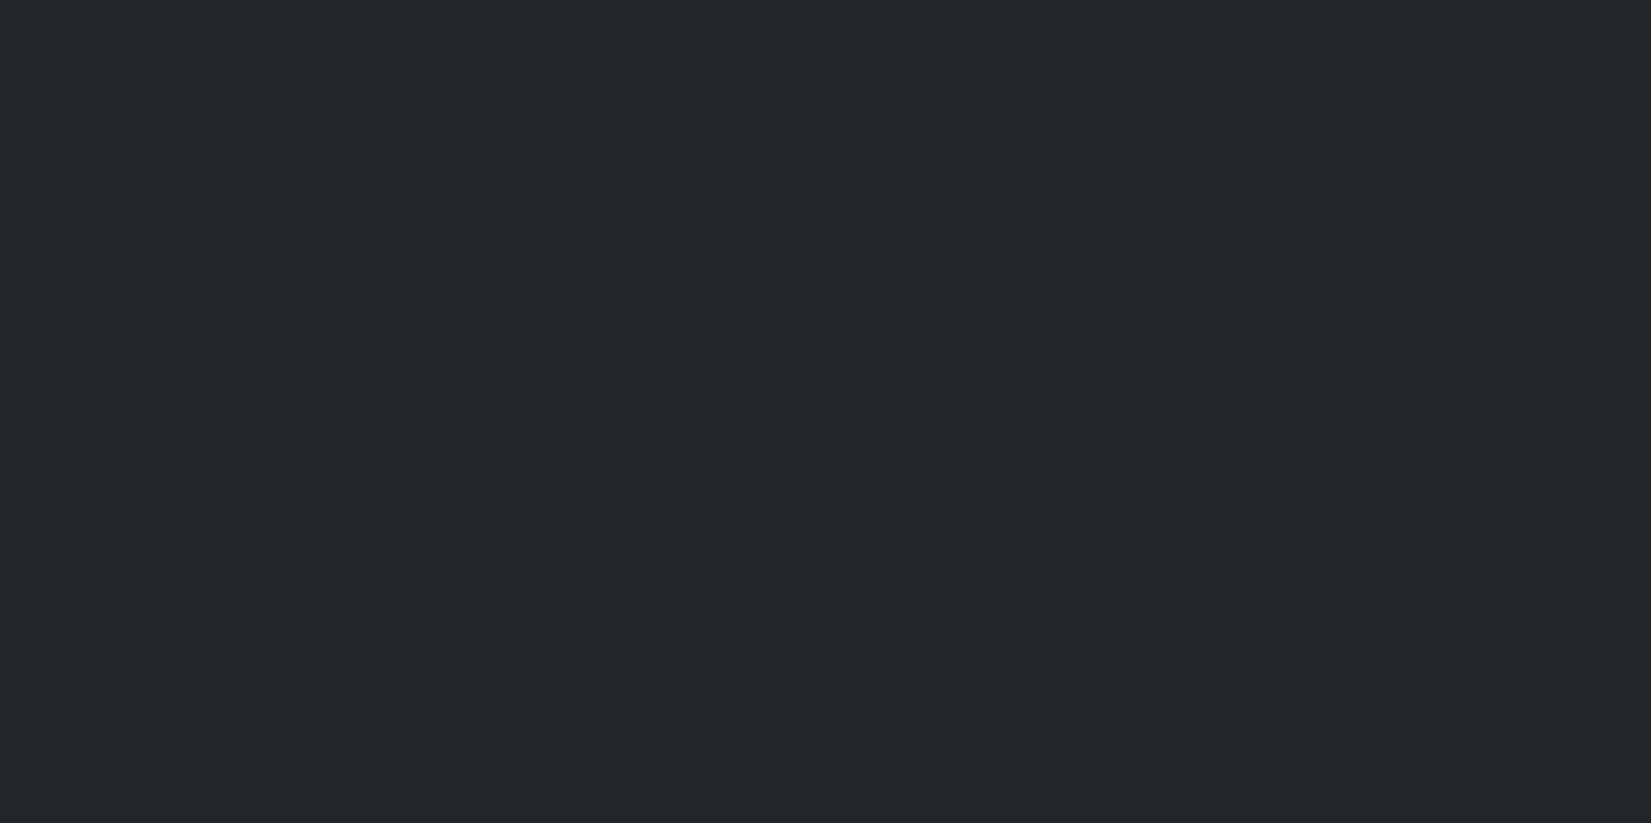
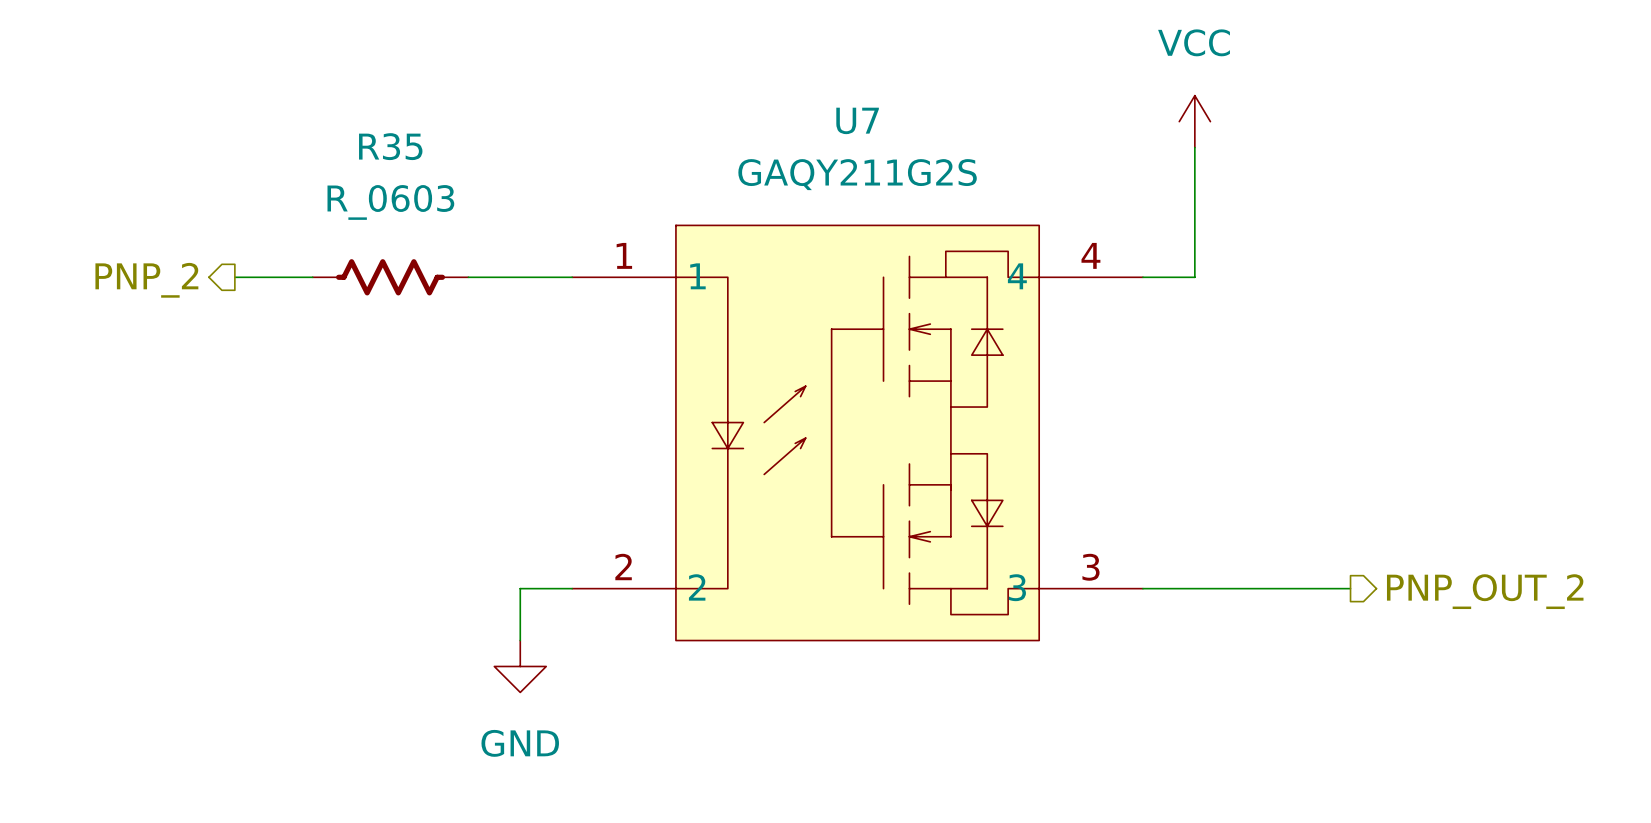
power symbol: none -> VCC (1194, 121)
wire: none -> (1194, 147) (1194, 277) (1142, 277)
hierarchical label: none -> PNP_2 (146, 280)
wire: none -> (234, 277) (312, 277)
R35: none -> R_0603 (390, 277)
wire: none -> (468, 277) (572, 277)
U7: none -> GAQY211G2S (857, 432)
wire: none -> (572, 588) (520, 588) (520, 640)
wire: none -> (1142, 588) (1350, 588)
hierarchical label: none -> PNP_OUT_2 (1485, 591)
power symbol: none -> GND (520, 666)

